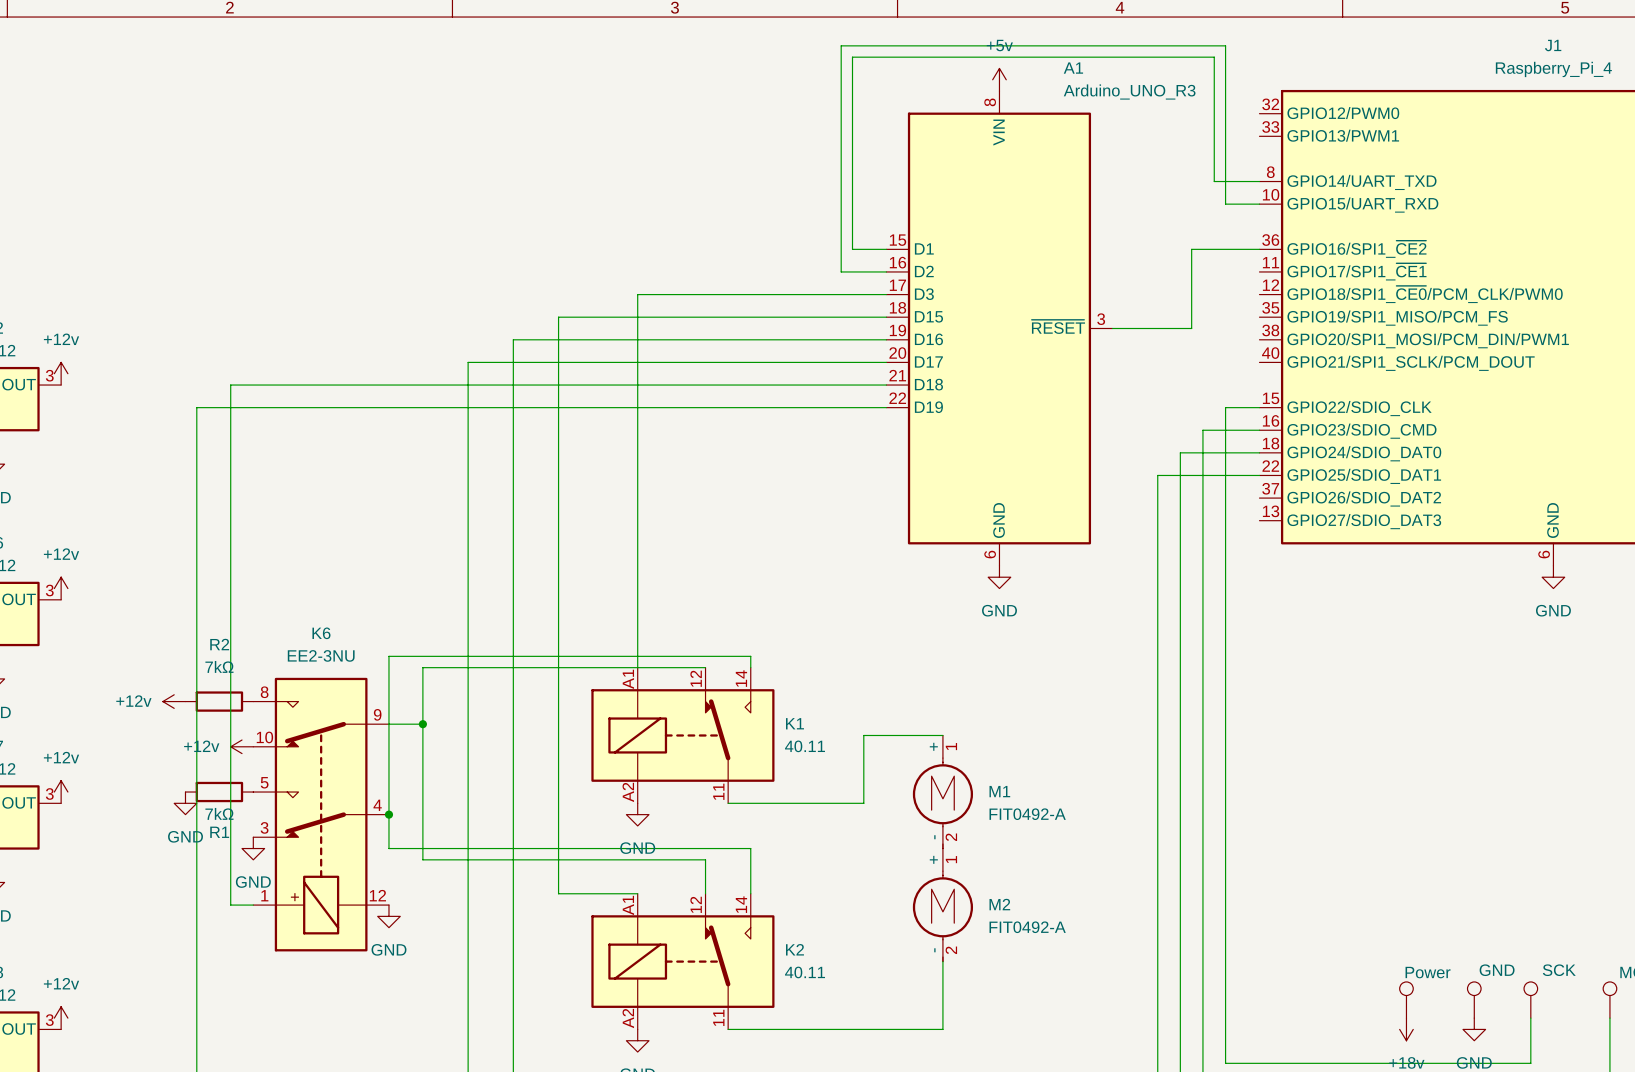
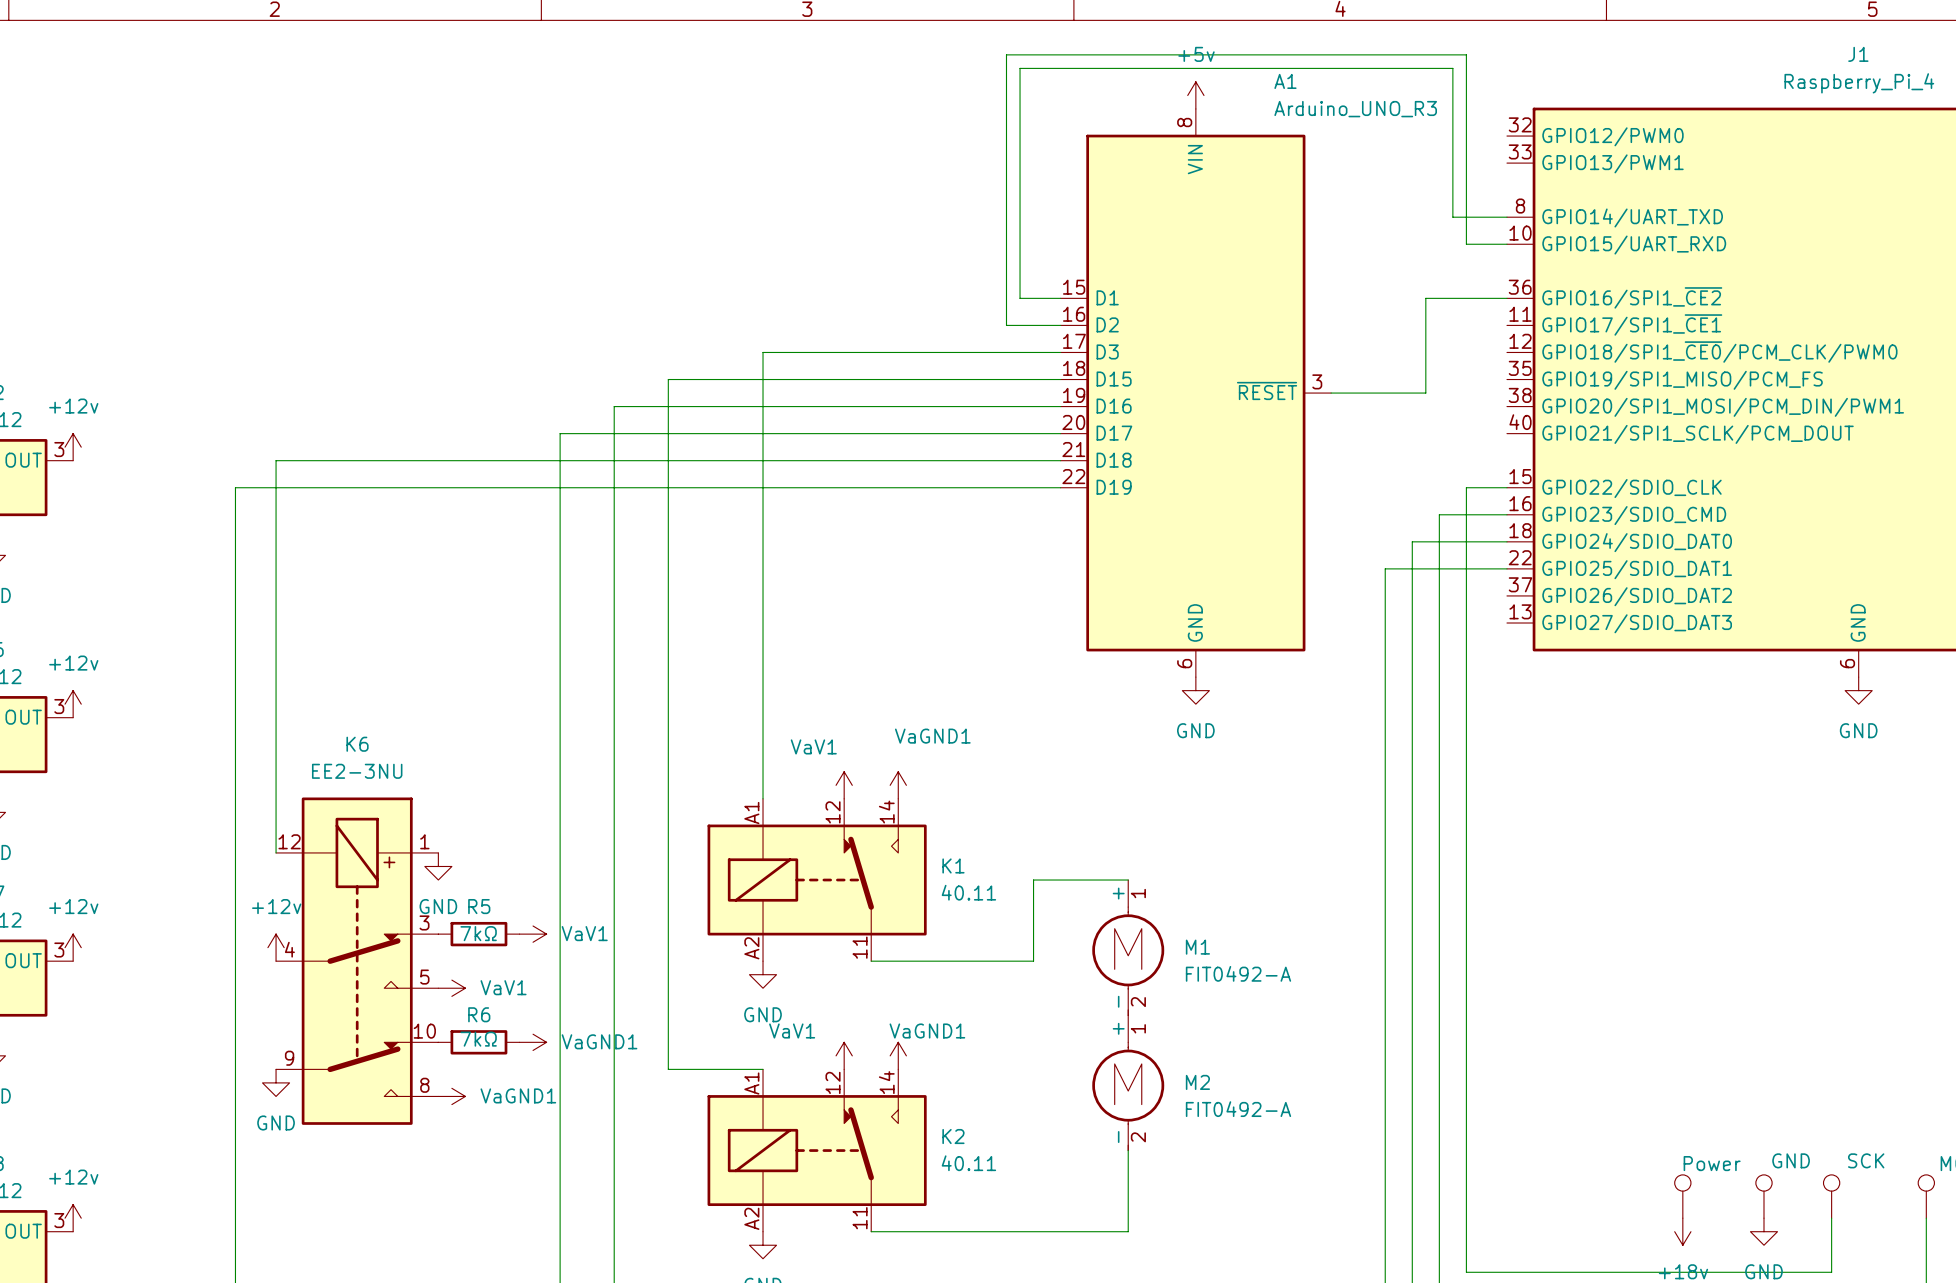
power symbol: none -> VaV1 (844, 785)
power symbol: none -> VaGND1 (898, 785)
wire: (705, 667) (422, 667) (422, 859) (705, 859) (705, 893) -> none
wire: (750, 667) (750, 656) (388, 656) (388, 848) (750, 848) (750, 893) -> none
power symbol: +12v (174, 701) -> none
R2: 7kΩ (219, 701) -> none
wire: (230, 712) (230, 905) (253, 905) -> none
power symbol: none -> GND (438, 866)
wire: (388, 724) (422, 724) -> none
junction: (422, 724) -> none
power symbol rotation: 0° (242, 746) -> 90° clockwise (276, 947)
power symbol position: +12v (242, 746) -> +12v (276, 947)
R5: none -> 7kΩ (478, 934)
power symbol: none -> VaV1 (533, 934)
R1: 7kΩ (219, 792) -> none
power symbol: GND (185, 803) -> none
K6 rotation: 0° (321, 814) -> 180° (357, 961)
junction: (388, 814) -> none
power symbol: none -> VaV1 (451, 988)
power symbol: GND (253, 848) -> none
R6: none -> 7kΩ (478, 1042)
power symbol: none -> VaGND1 (533, 1042)
power symbol: none -> VaV1 (844, 1055)
power symbol: none -> VaGND1 (898, 1055)
power symbol: none -> GND (276, 1082)
power symbol: none -> VaGND1 (451, 1096)
power symbol: GND (388, 916) -> none

